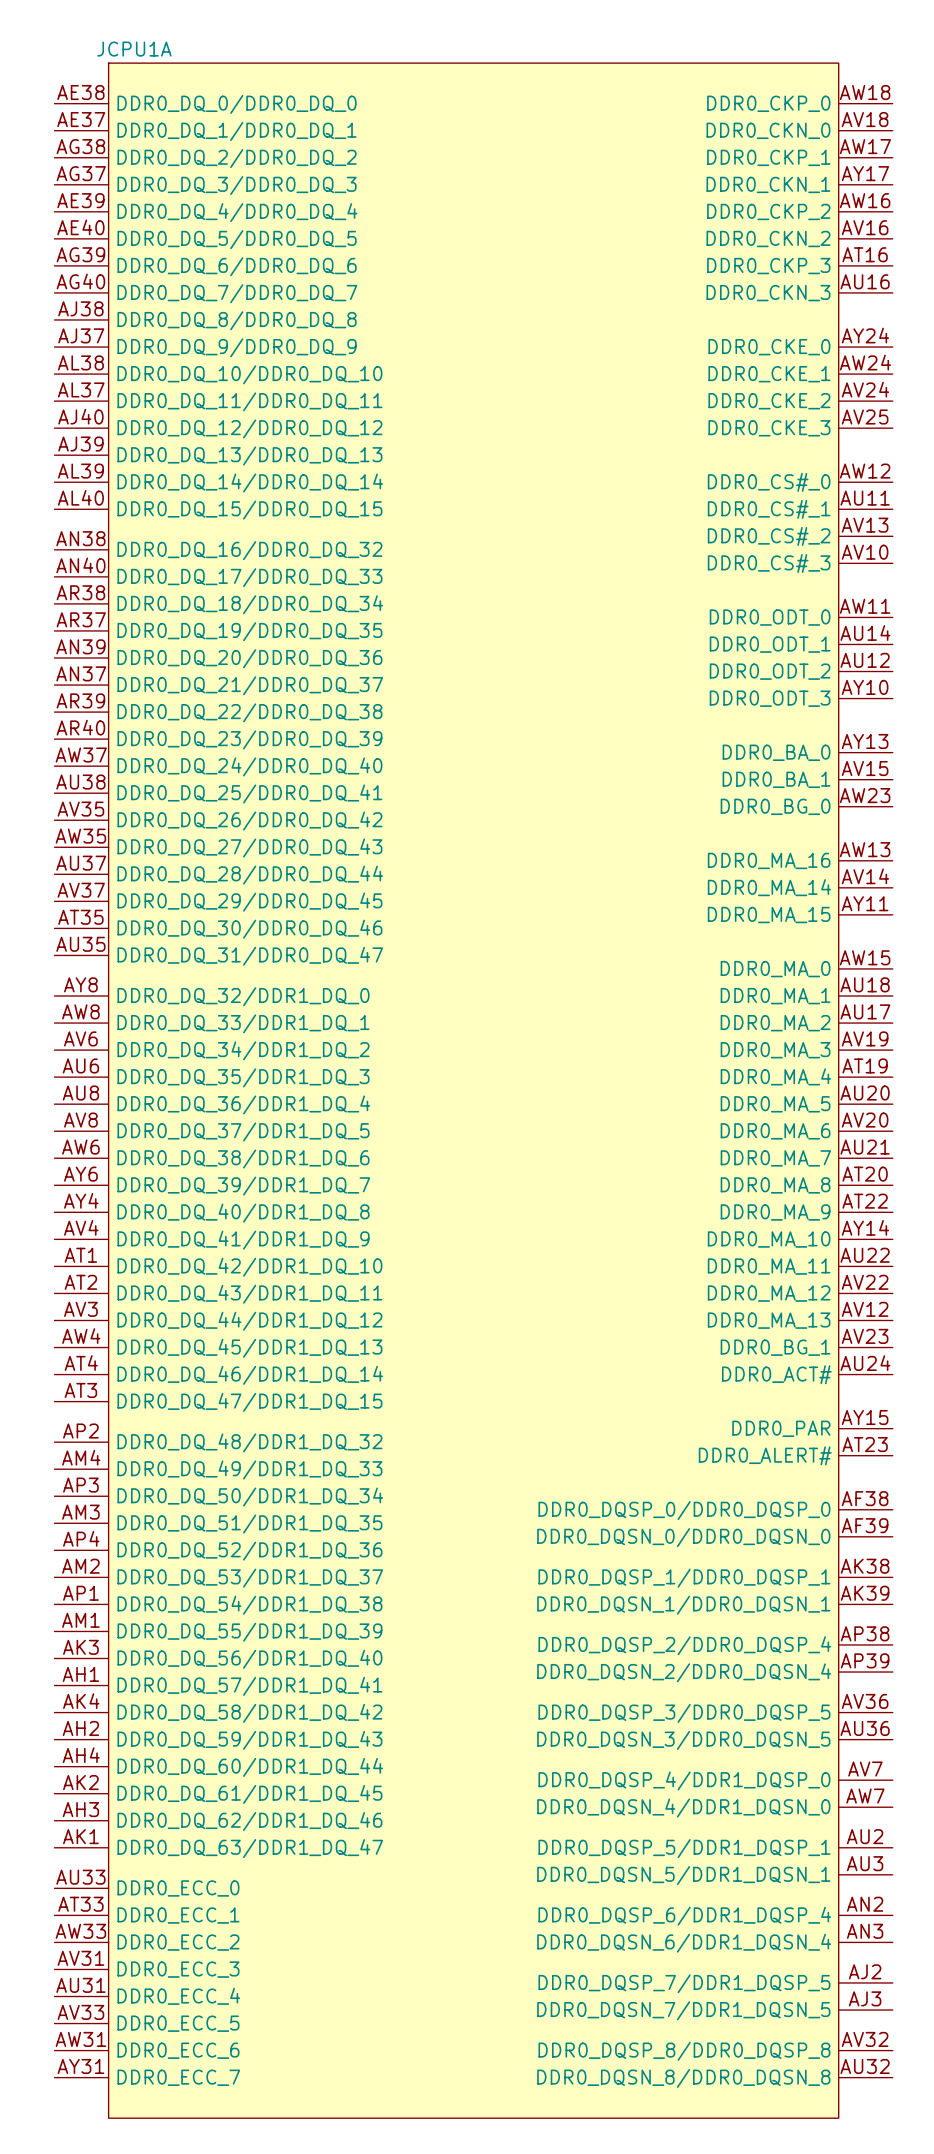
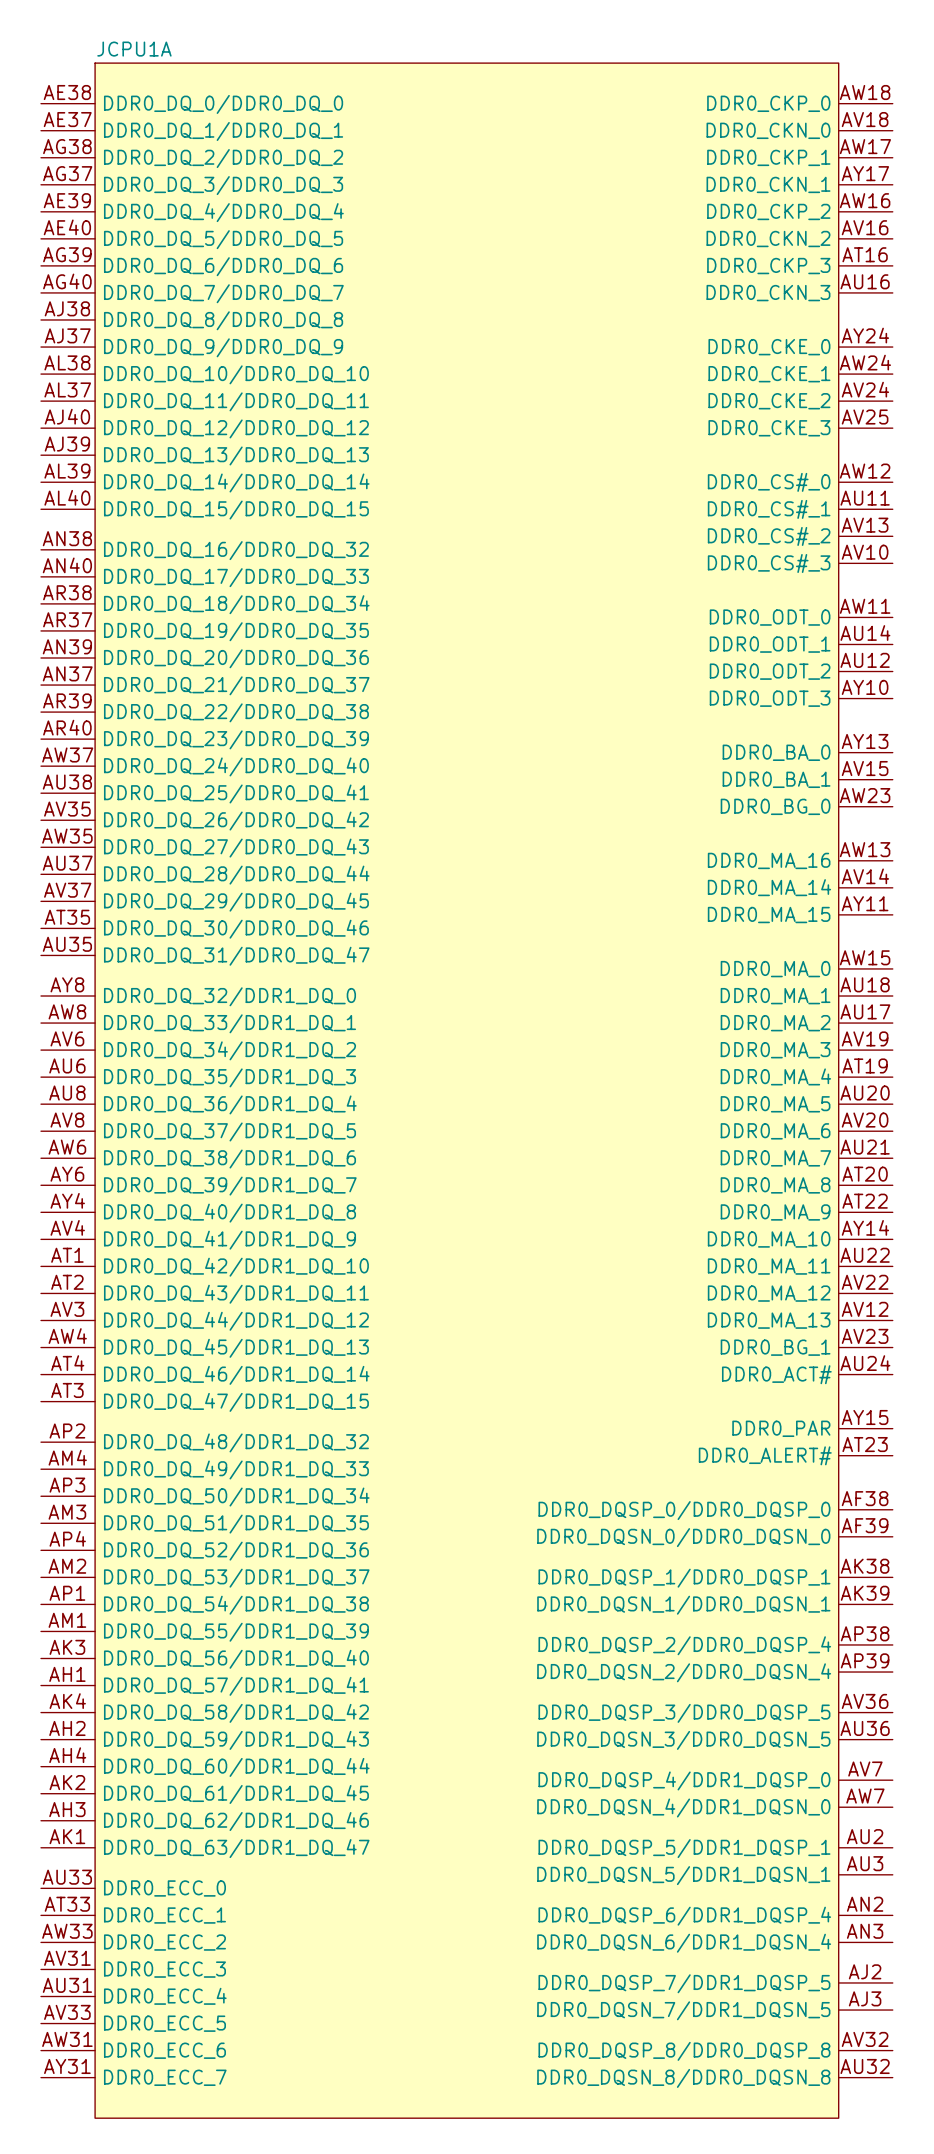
JCPU1A symbol: [54, 63, 893, 2119] -> [41, 63, 893, 2119]

